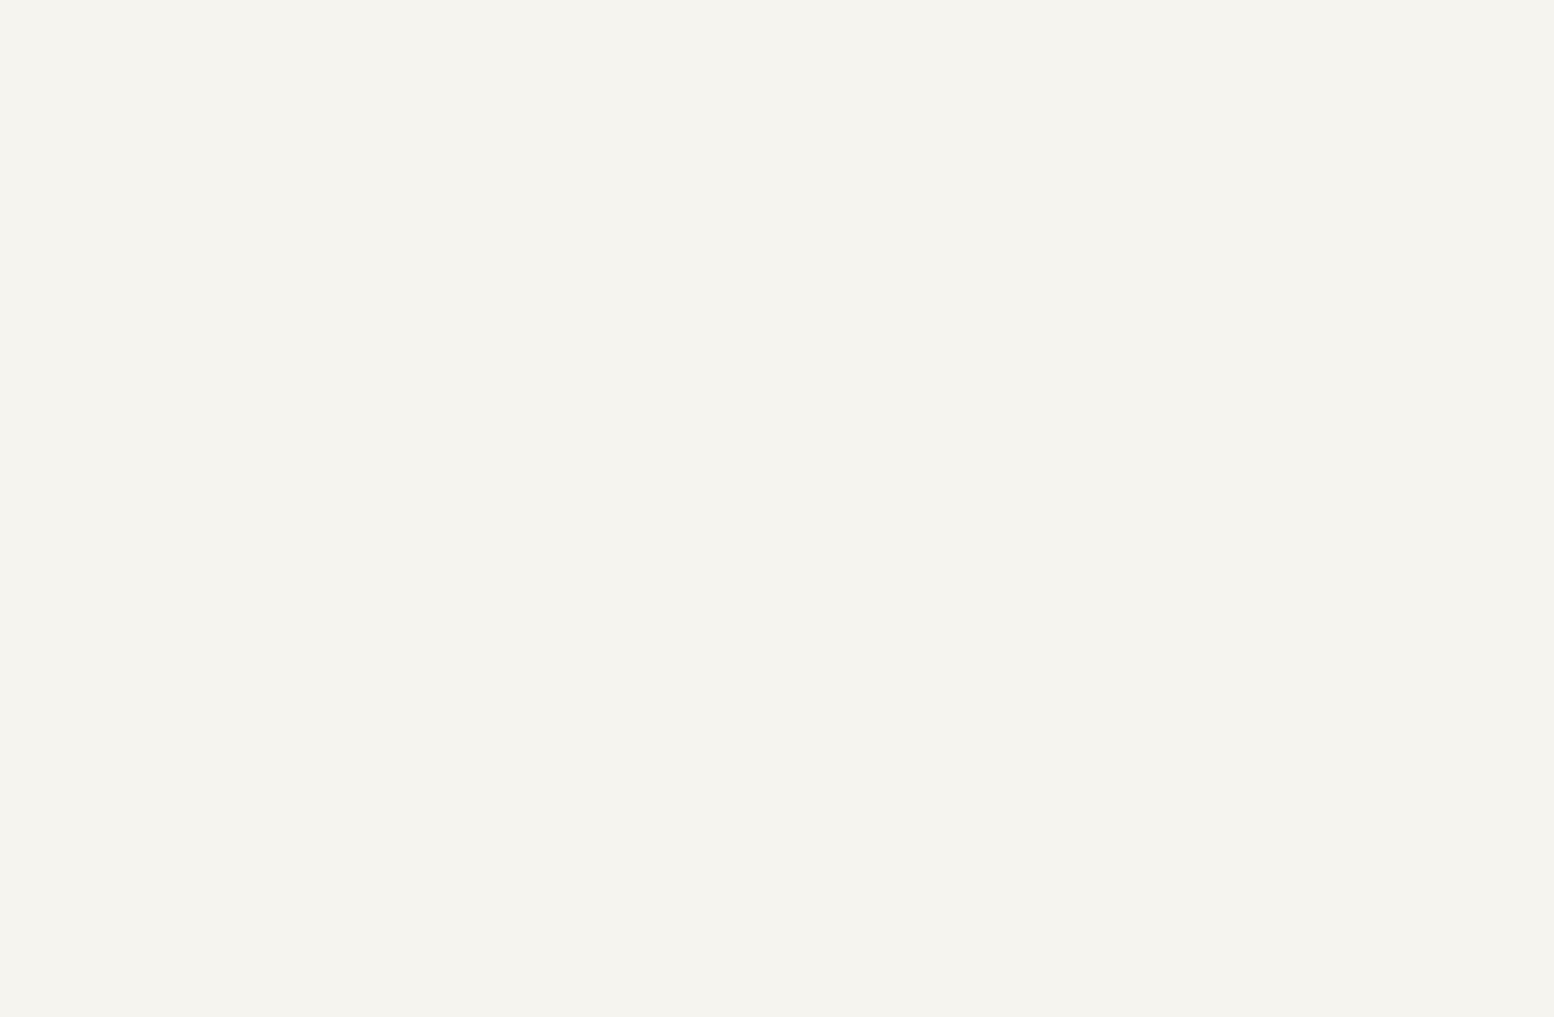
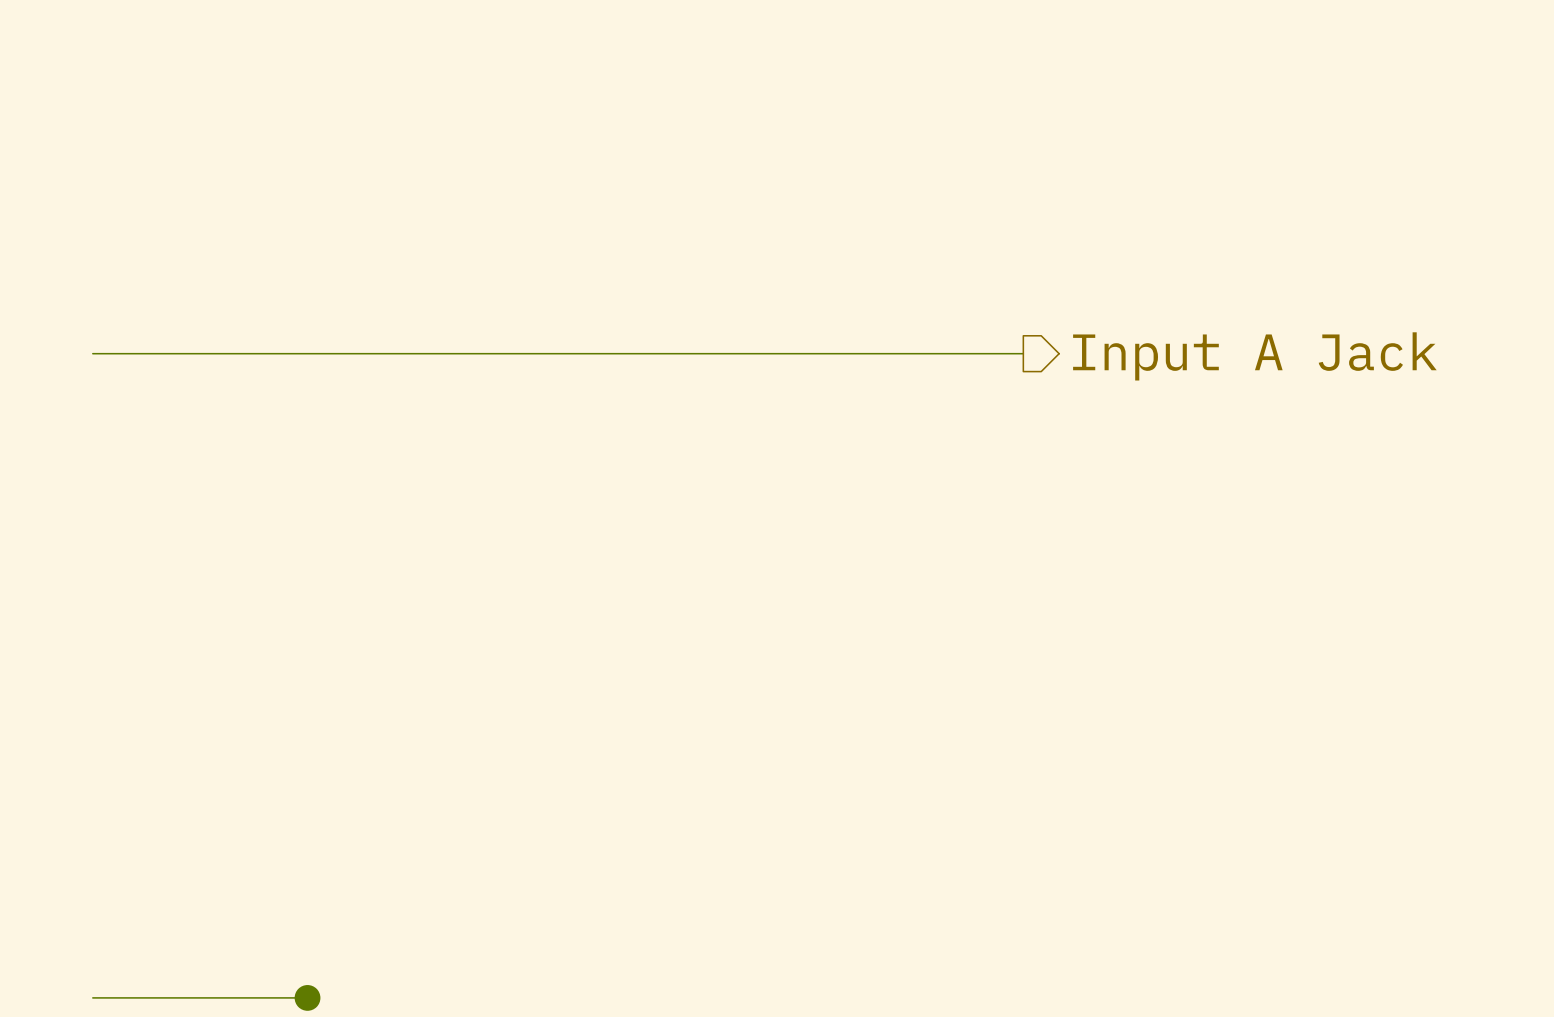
wire: none -> (92, 353) (1023, 353)
hierarchical label: none -> Input A Jack (1254, 356)
wire: none -> (92, 997) (307, 997)
junction: none -> (307, 997)

